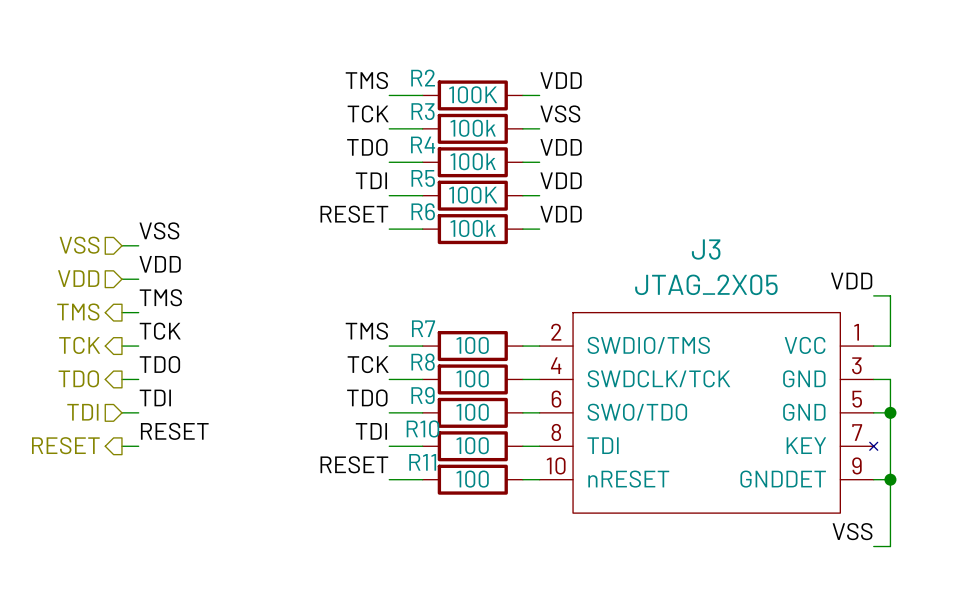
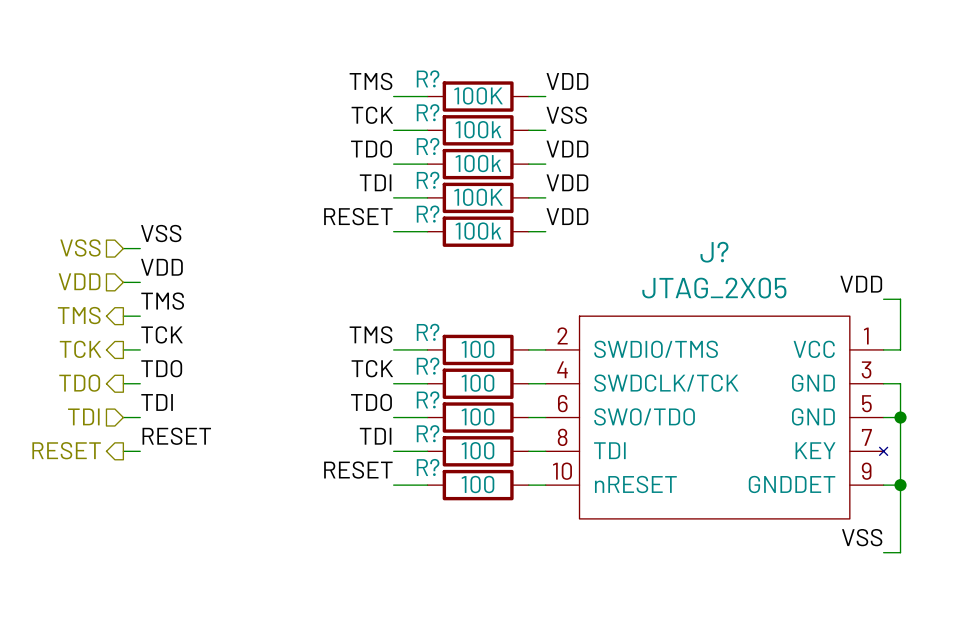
R2 name: R2 (423, 78) -> R? (428, 78)
R3 name: R3 (423, 111) -> R? (428, 112)
R4 name: R4 (423, 144) -> R? (428, 146)
R5 name: R5 (423, 178) -> R? (428, 180)
R6 name: R6 (423, 211) -> R? (428, 214)
J3 name: J3 (706, 249) -> J? (714, 252)
R7 name: R7 (423, 328) -> R? (428, 332)
R8 name: R8 (423, 362) -> R? (428, 366)
R9 name: R9 (423, 395) -> R? (428, 399)
R10 name: R10 (422, 428) -> R? (428, 433)
R11 name: R11 (422, 462) -> R? (428, 467)

